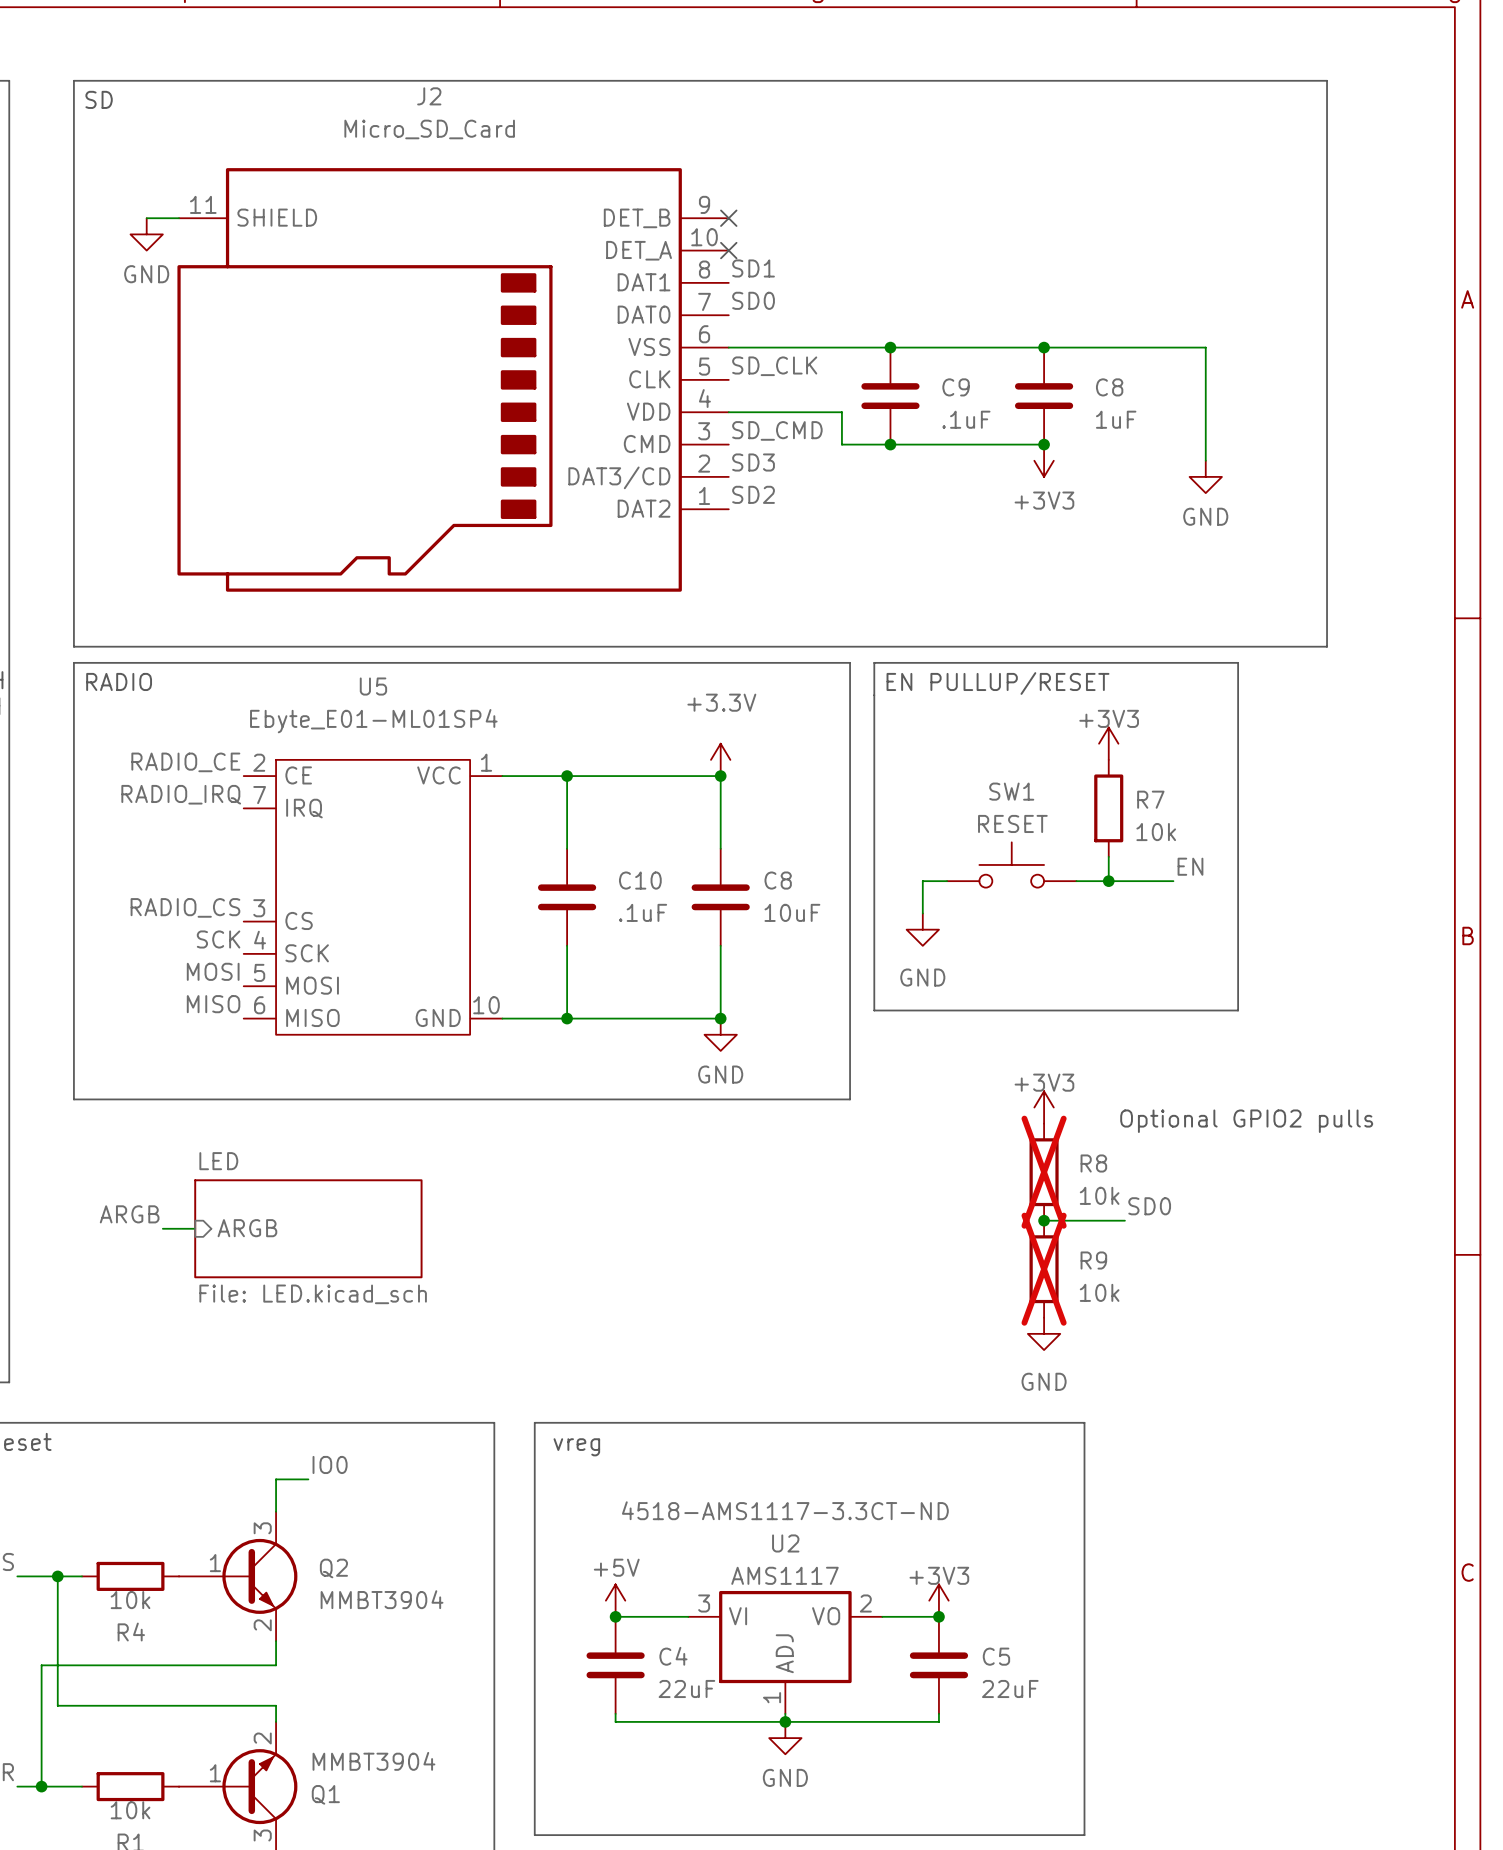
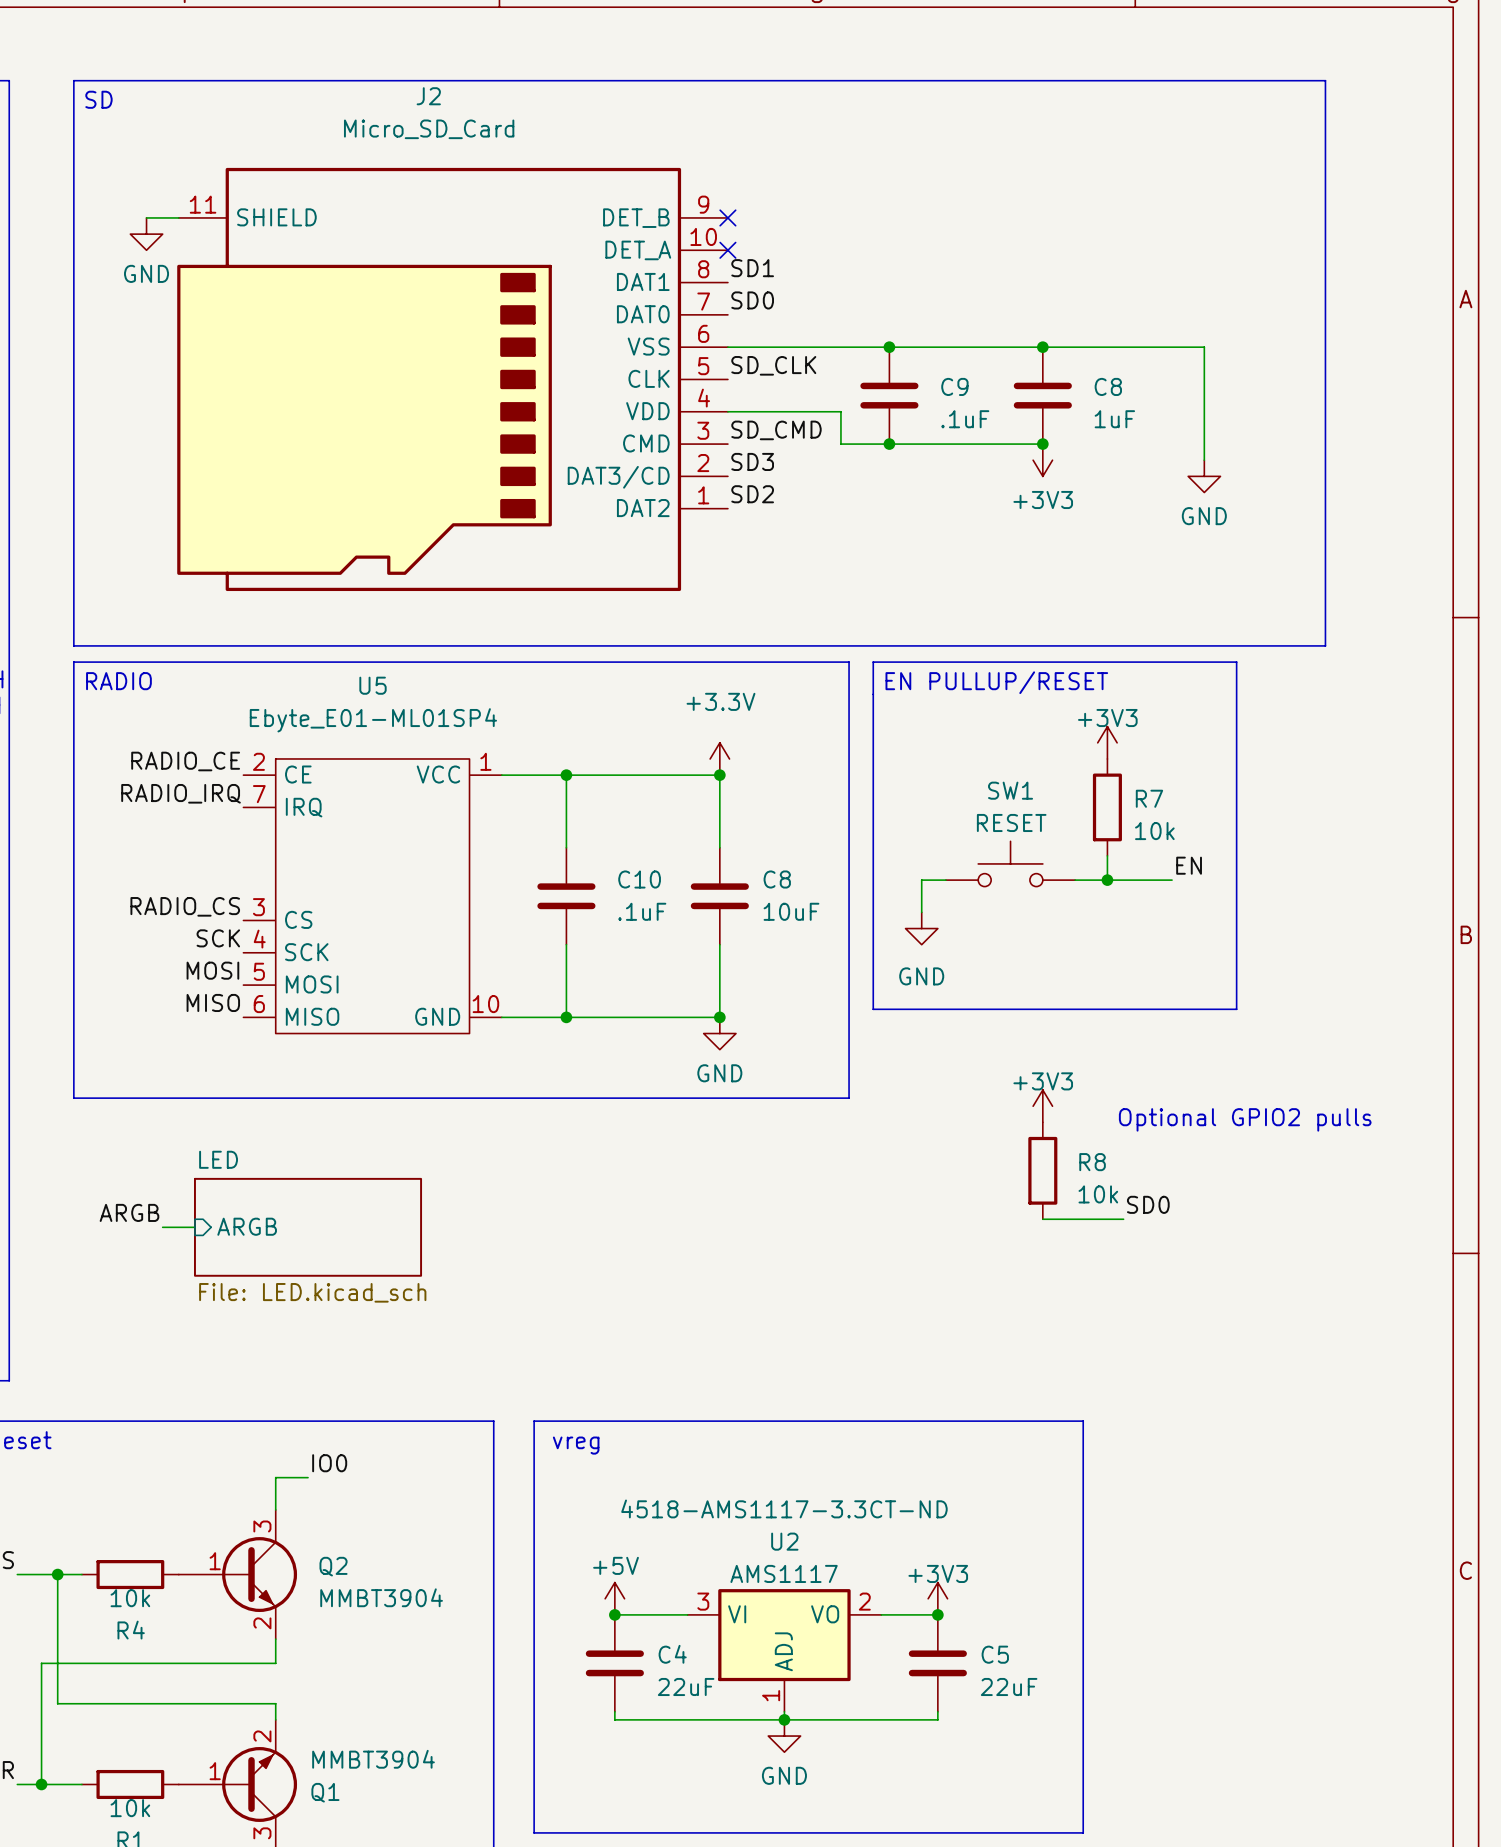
R8 do-not-place cross: (1044, 1172) -> none
junction: (1044, 1220) -> none
R9: 10k (1044, 1269) -> none
power symbol: GND (1044, 1333) -> none

